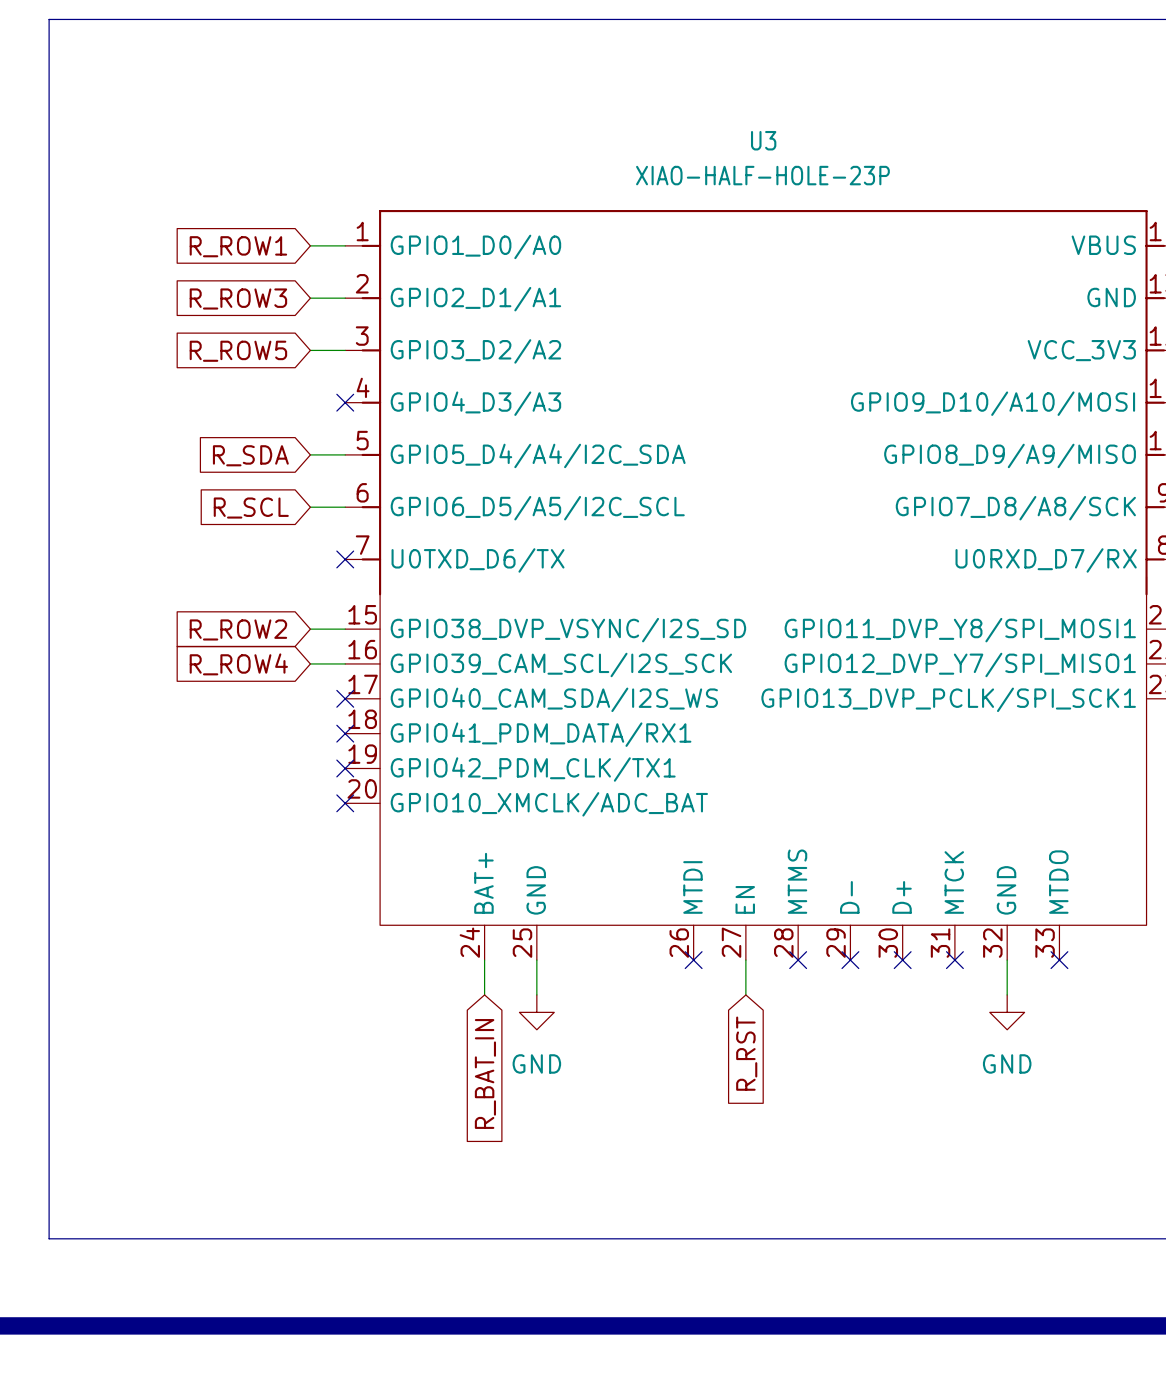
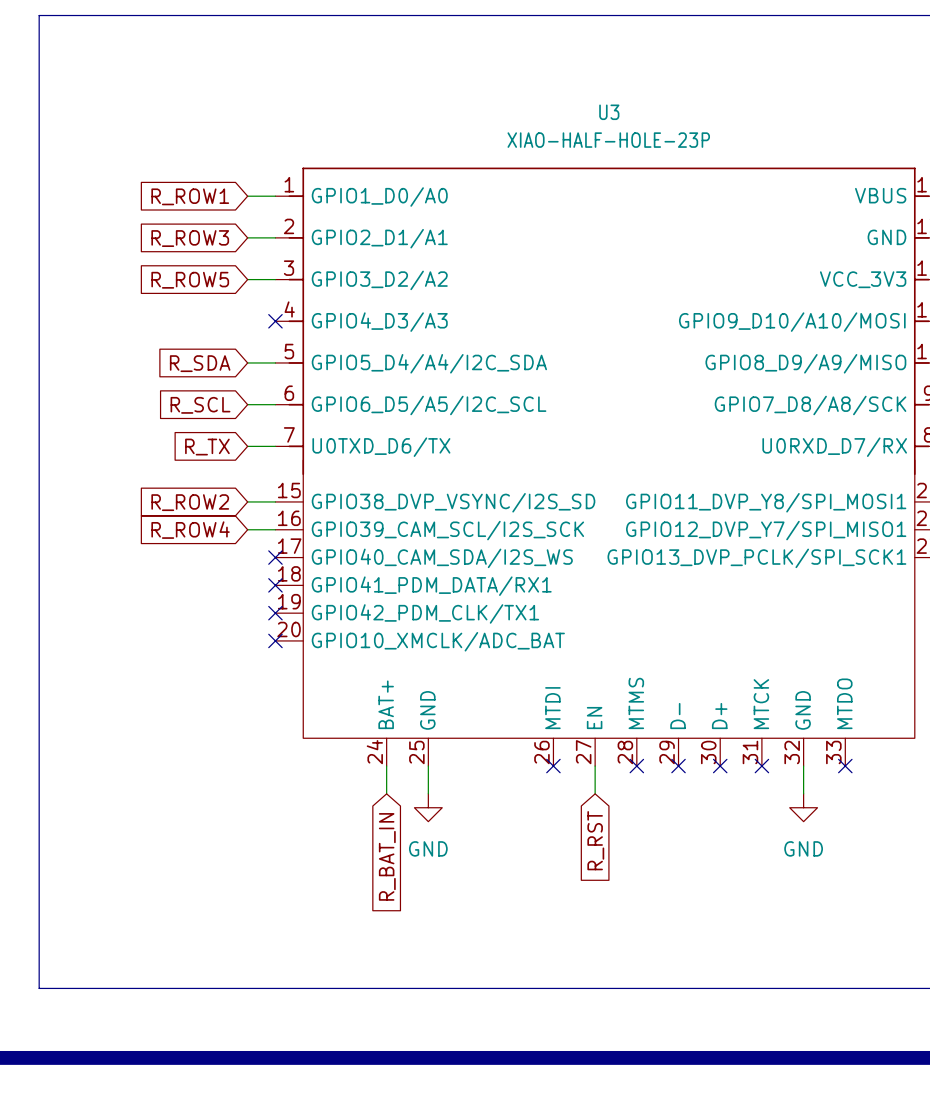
wire: none -> (247, 446) (275, 446)
no-connect mark: (345, 559) -> none
global label: none -> R_TX (207, 447)

